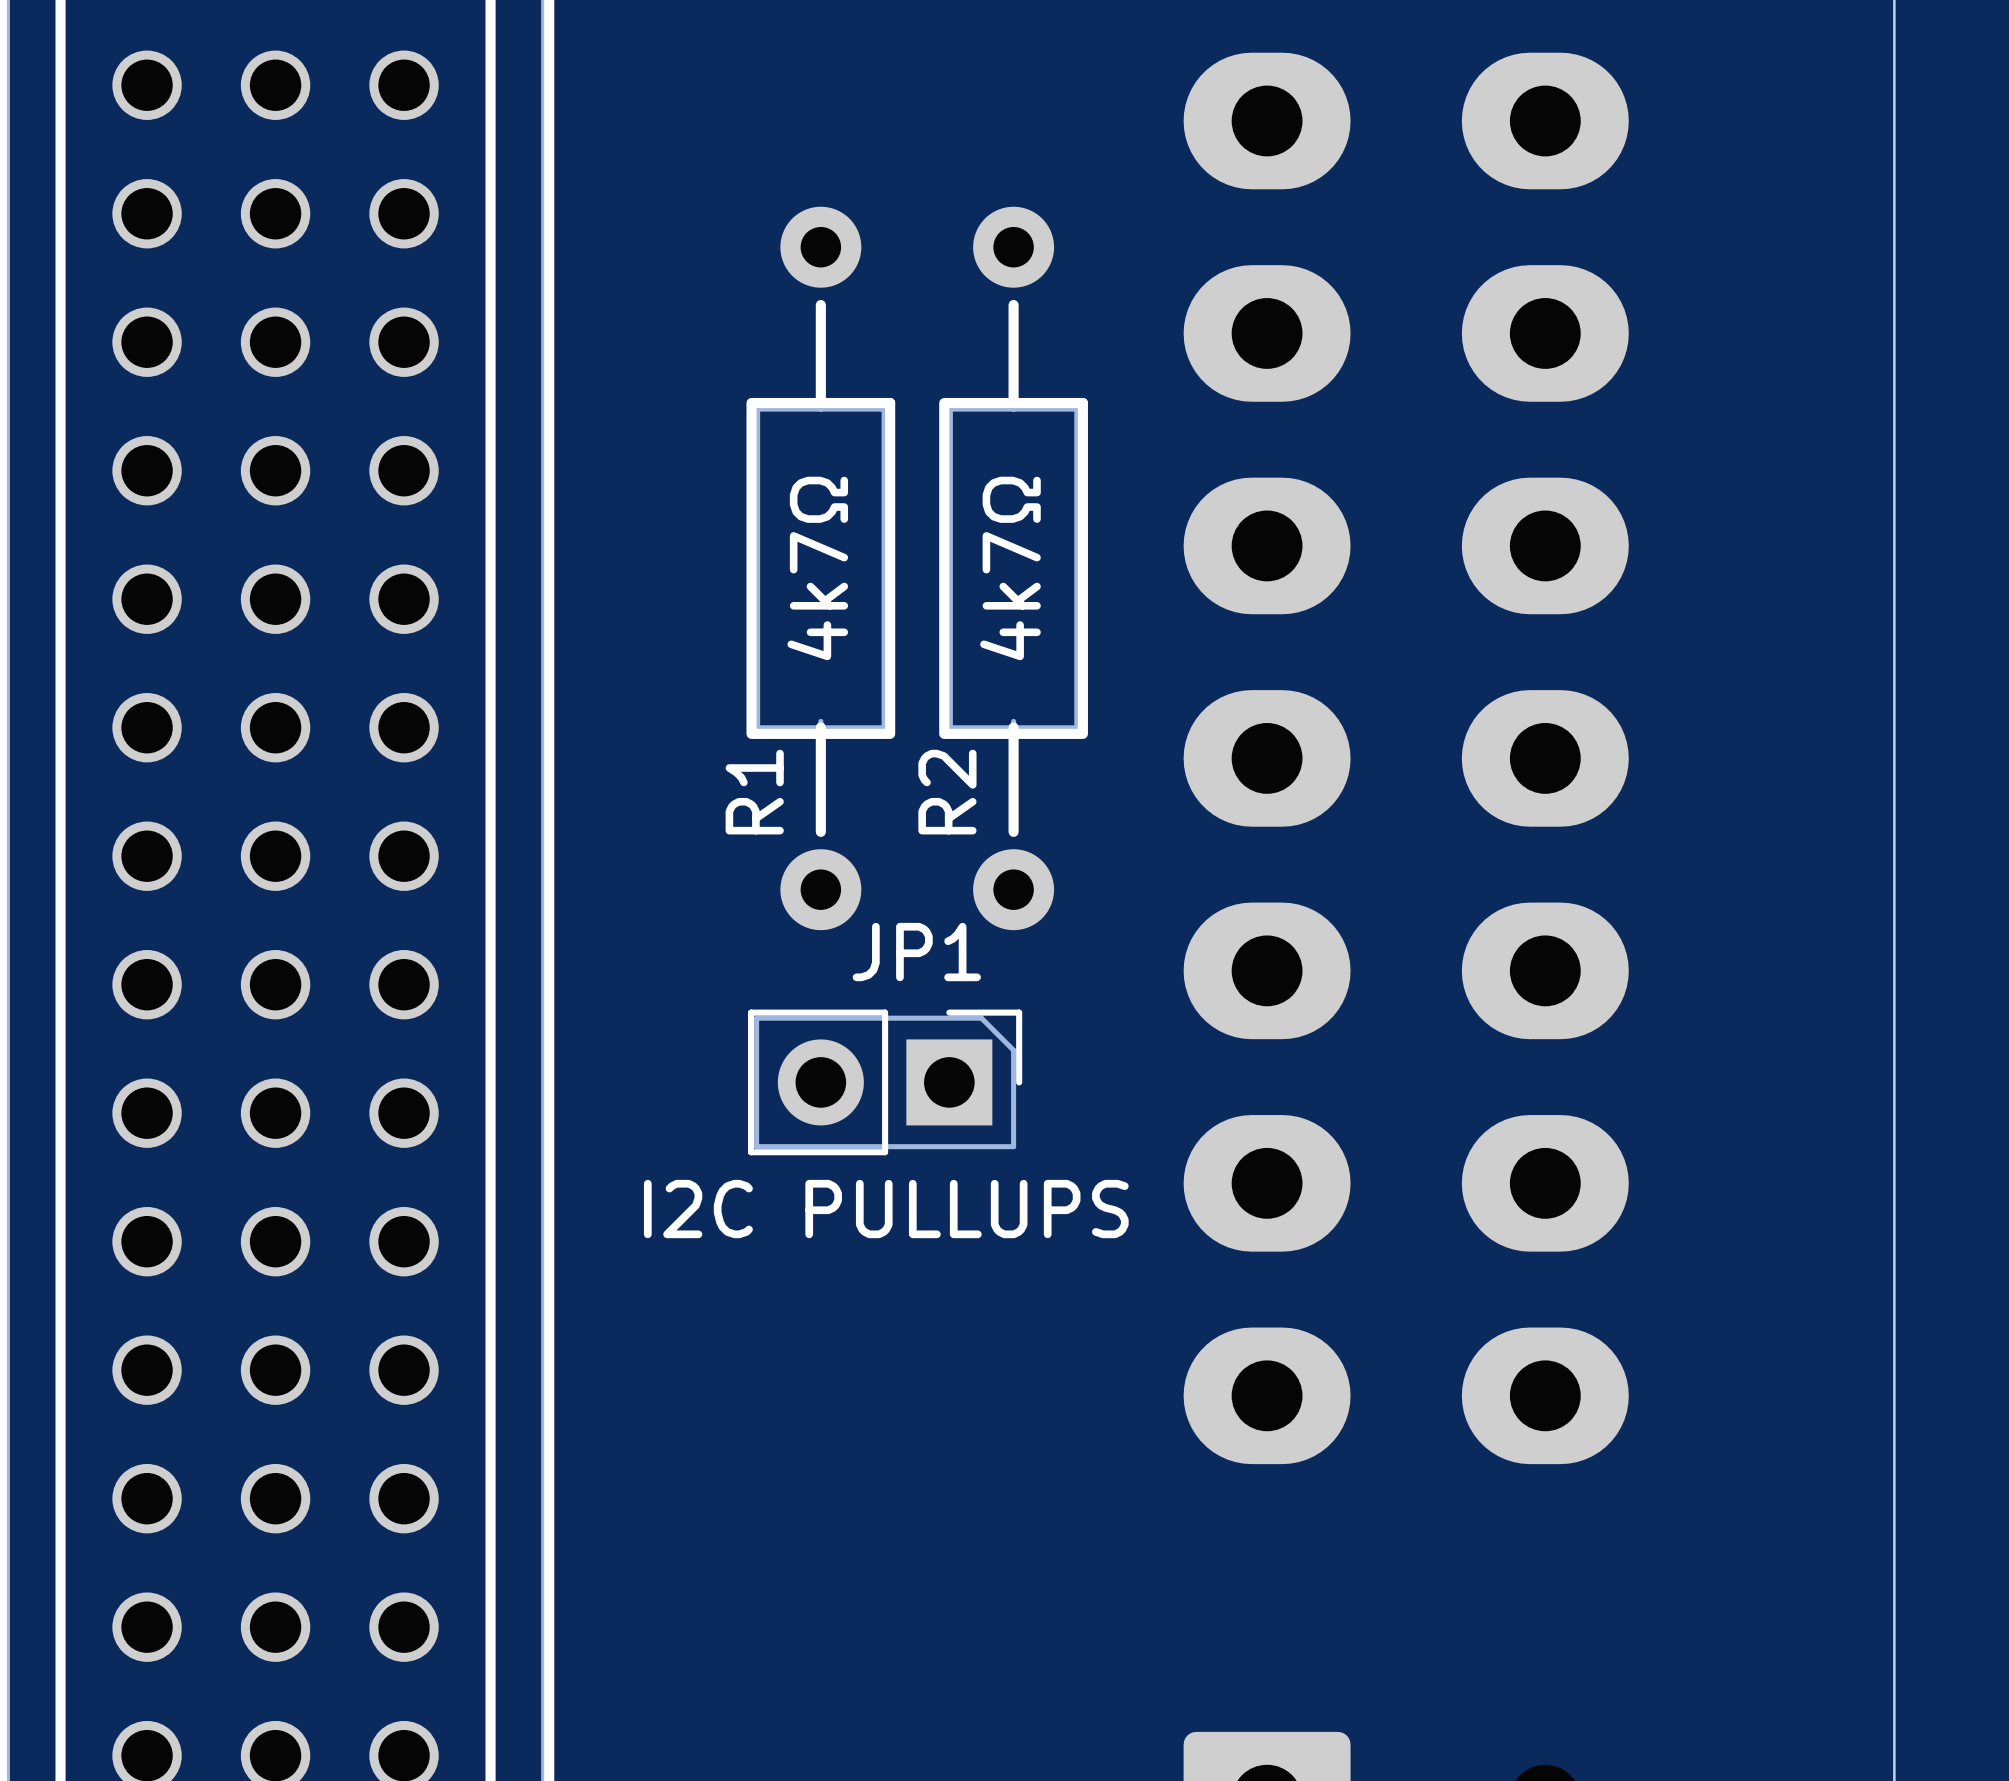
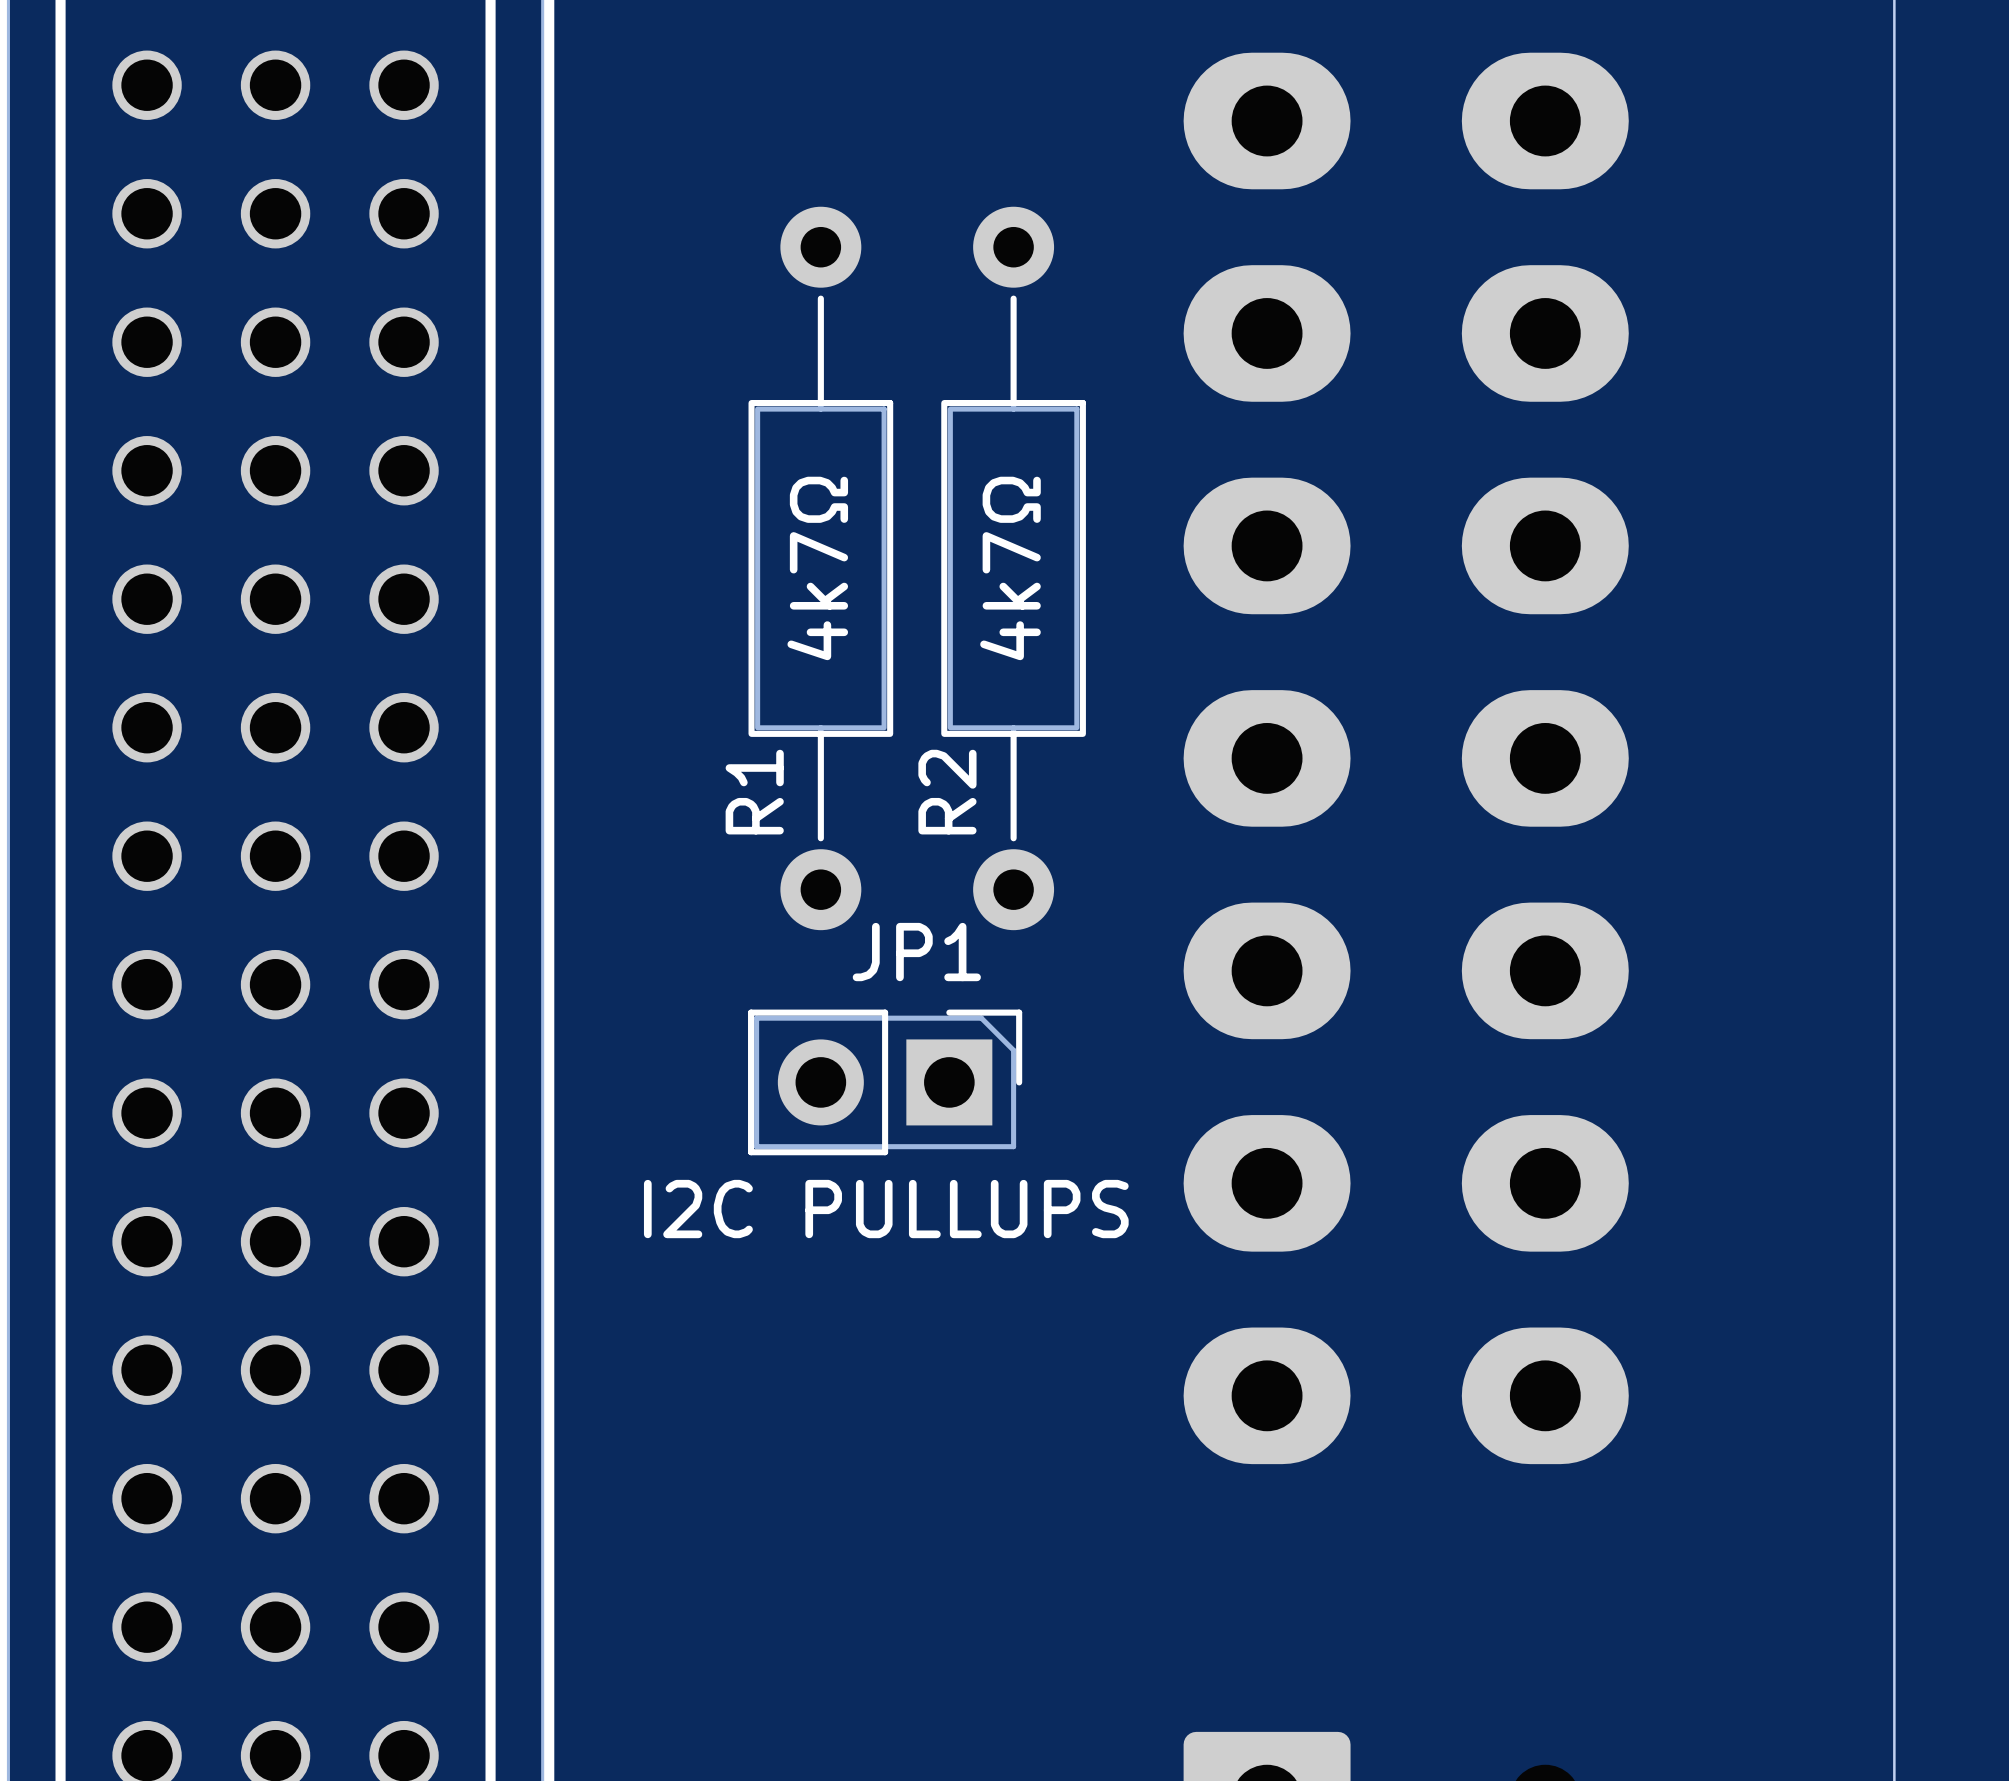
R1 footprint: [746, 206, 896, 931] -> [748, 206, 894, 931]
R2 footprint: [939, 206, 1088, 931] -> [941, 206, 1086, 931]

